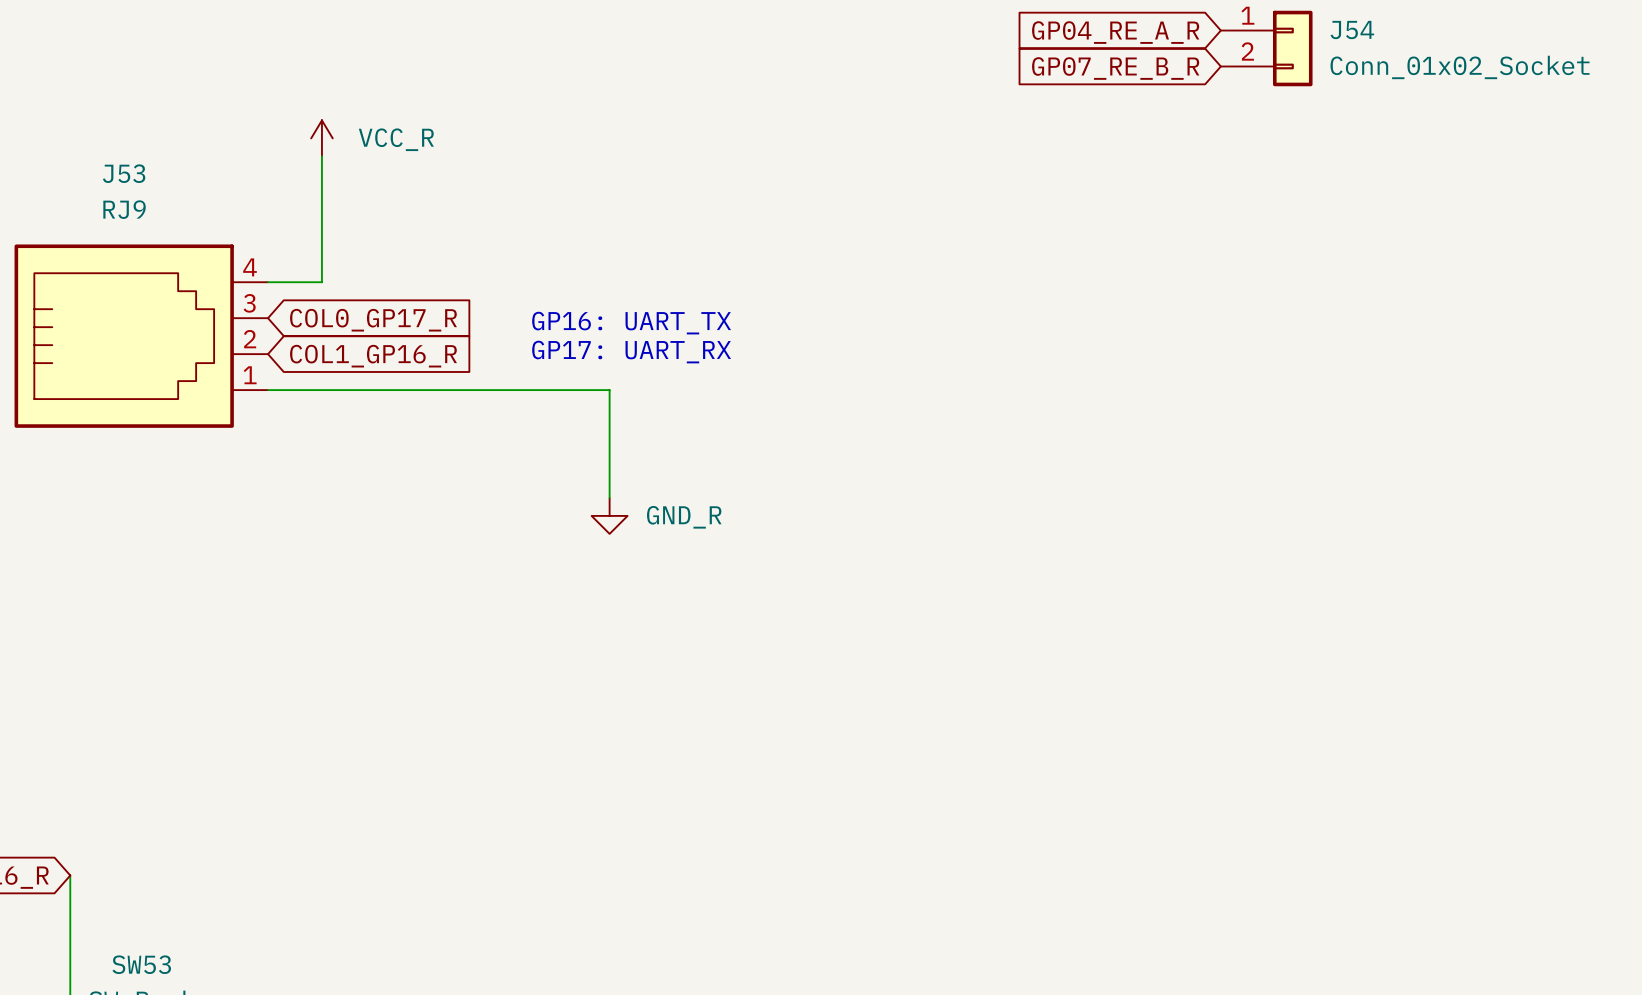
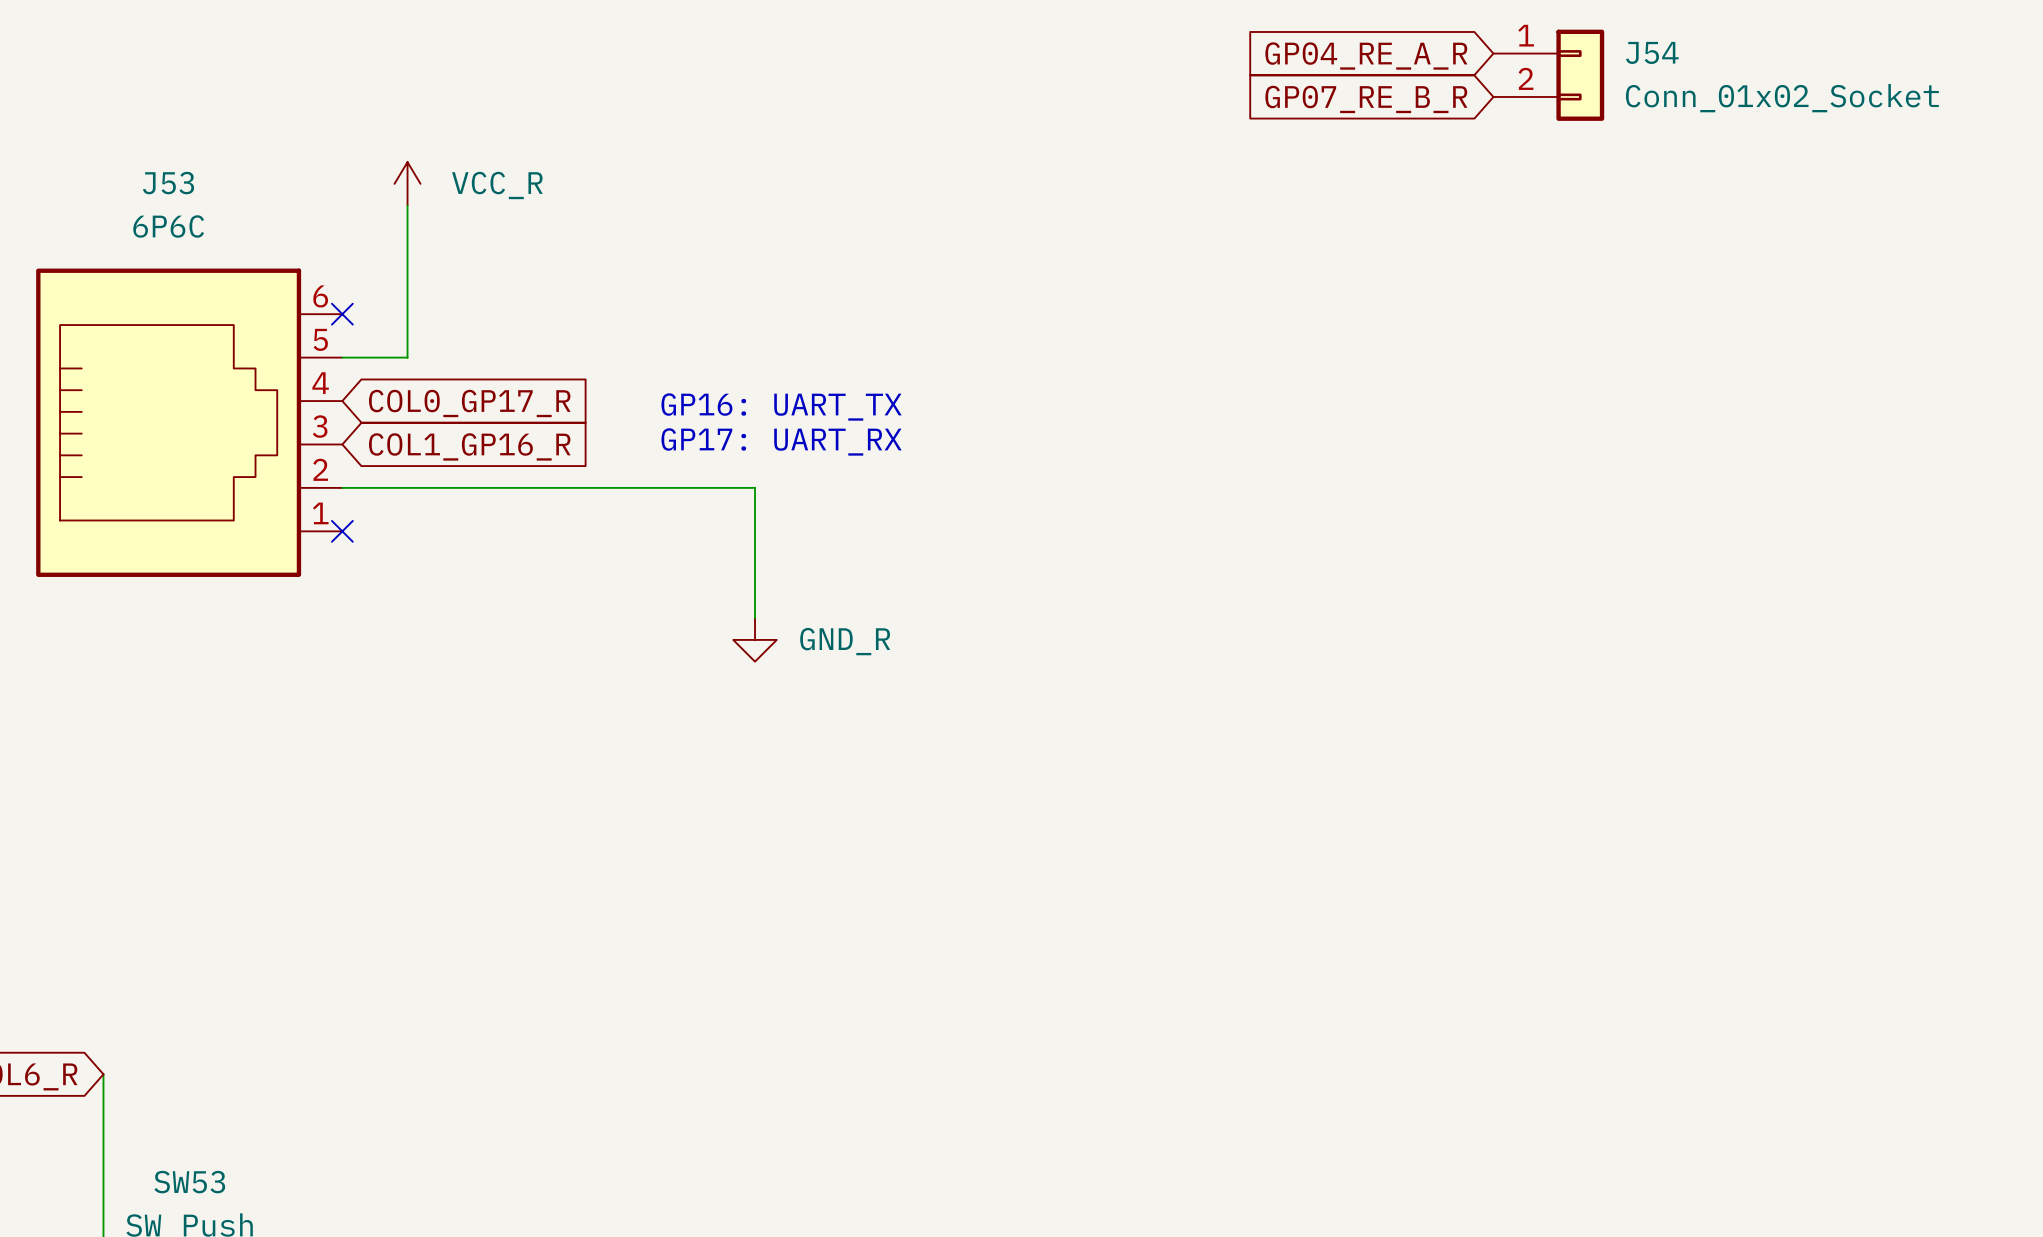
J53 name position: J53 (124, 173) -> J53 (168, 183)
J53 value: RJ9 (124, 209) -> 6P6C (168, 226)
J53 symbol: [14, 244, 269, 428] -> [36, 268, 343, 577]
no-connect mark: none -> (342, 314)
no-connect mark: none -> (342, 531)

